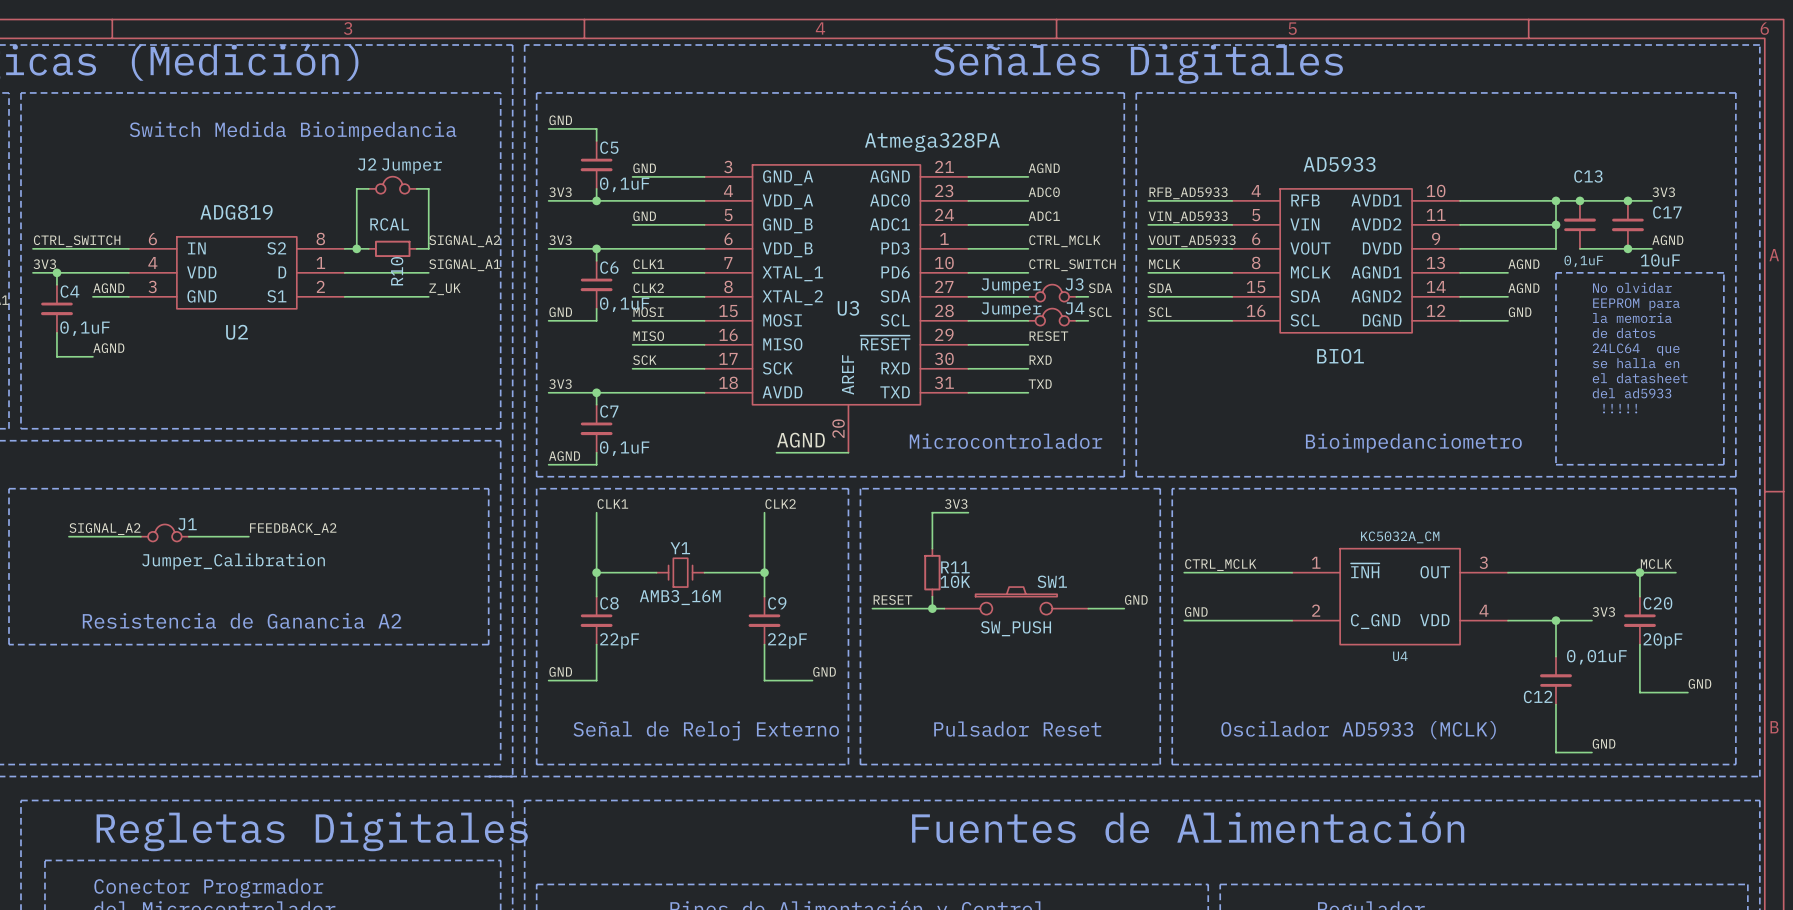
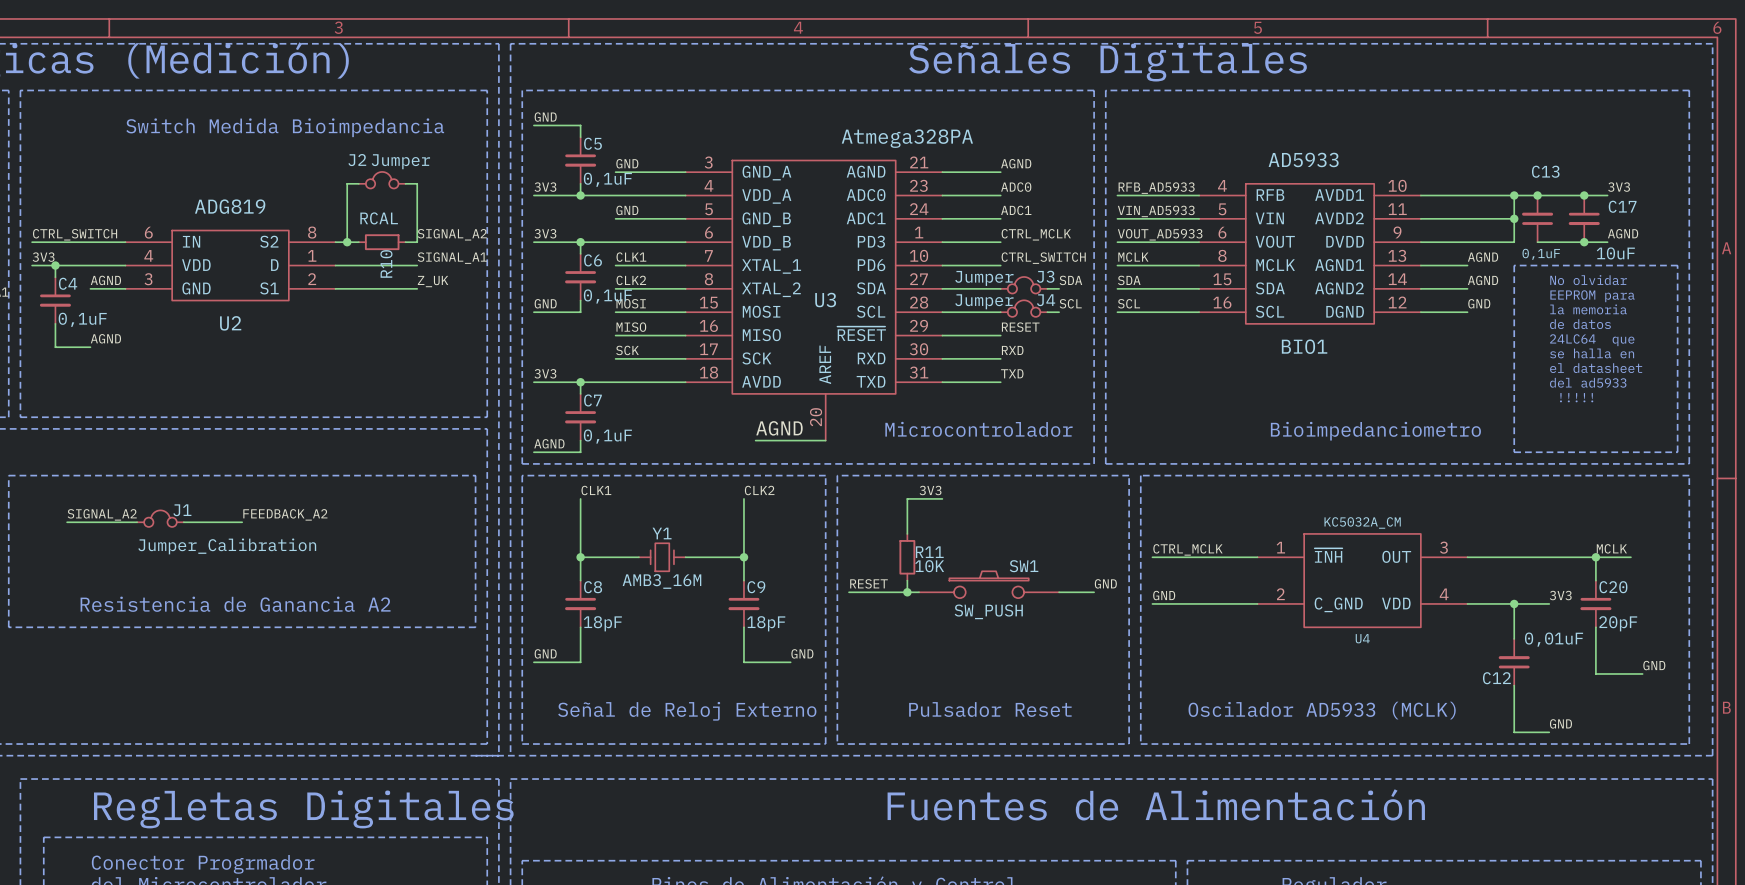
C8 value: 22pF (619, 640) -> 18pF (602, 623)
C9 value: 22pF (787, 640) -> 18pF (766, 623)

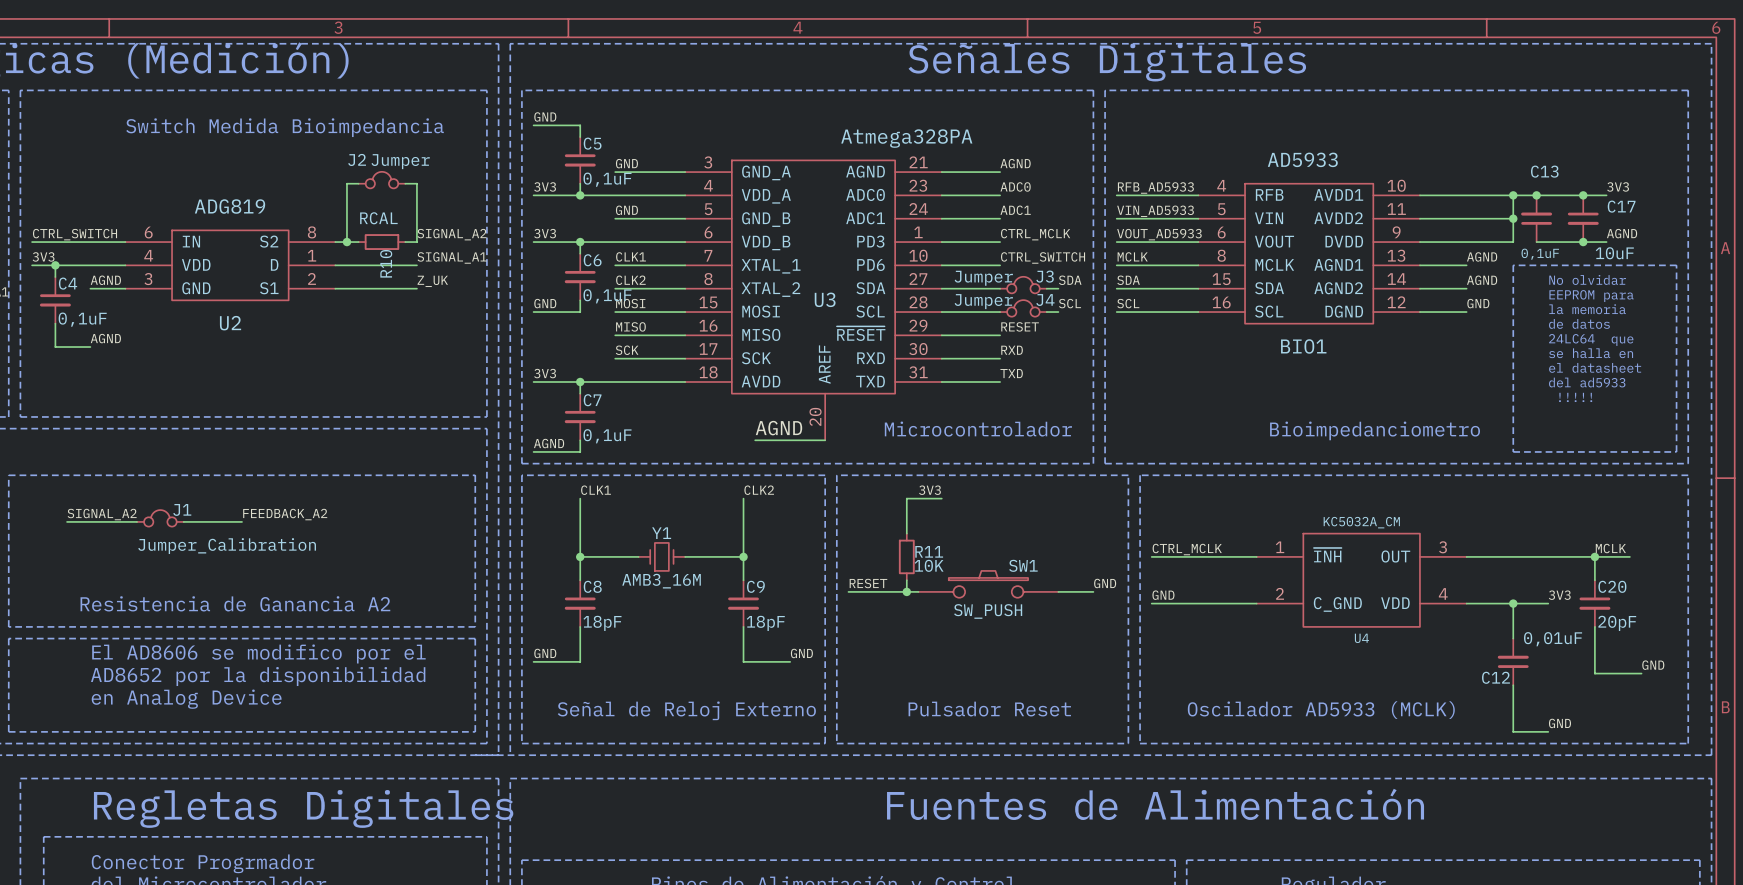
line: none -> (8, 638) (8, 731) (475, 731) (475, 638) (8, 638)
text: none -> El AD8606 se modifico por el (258, 653)
text: none -> AD8652 por la disponibilidad (258, 676)
text: none -> en Analog Device (186, 699)

